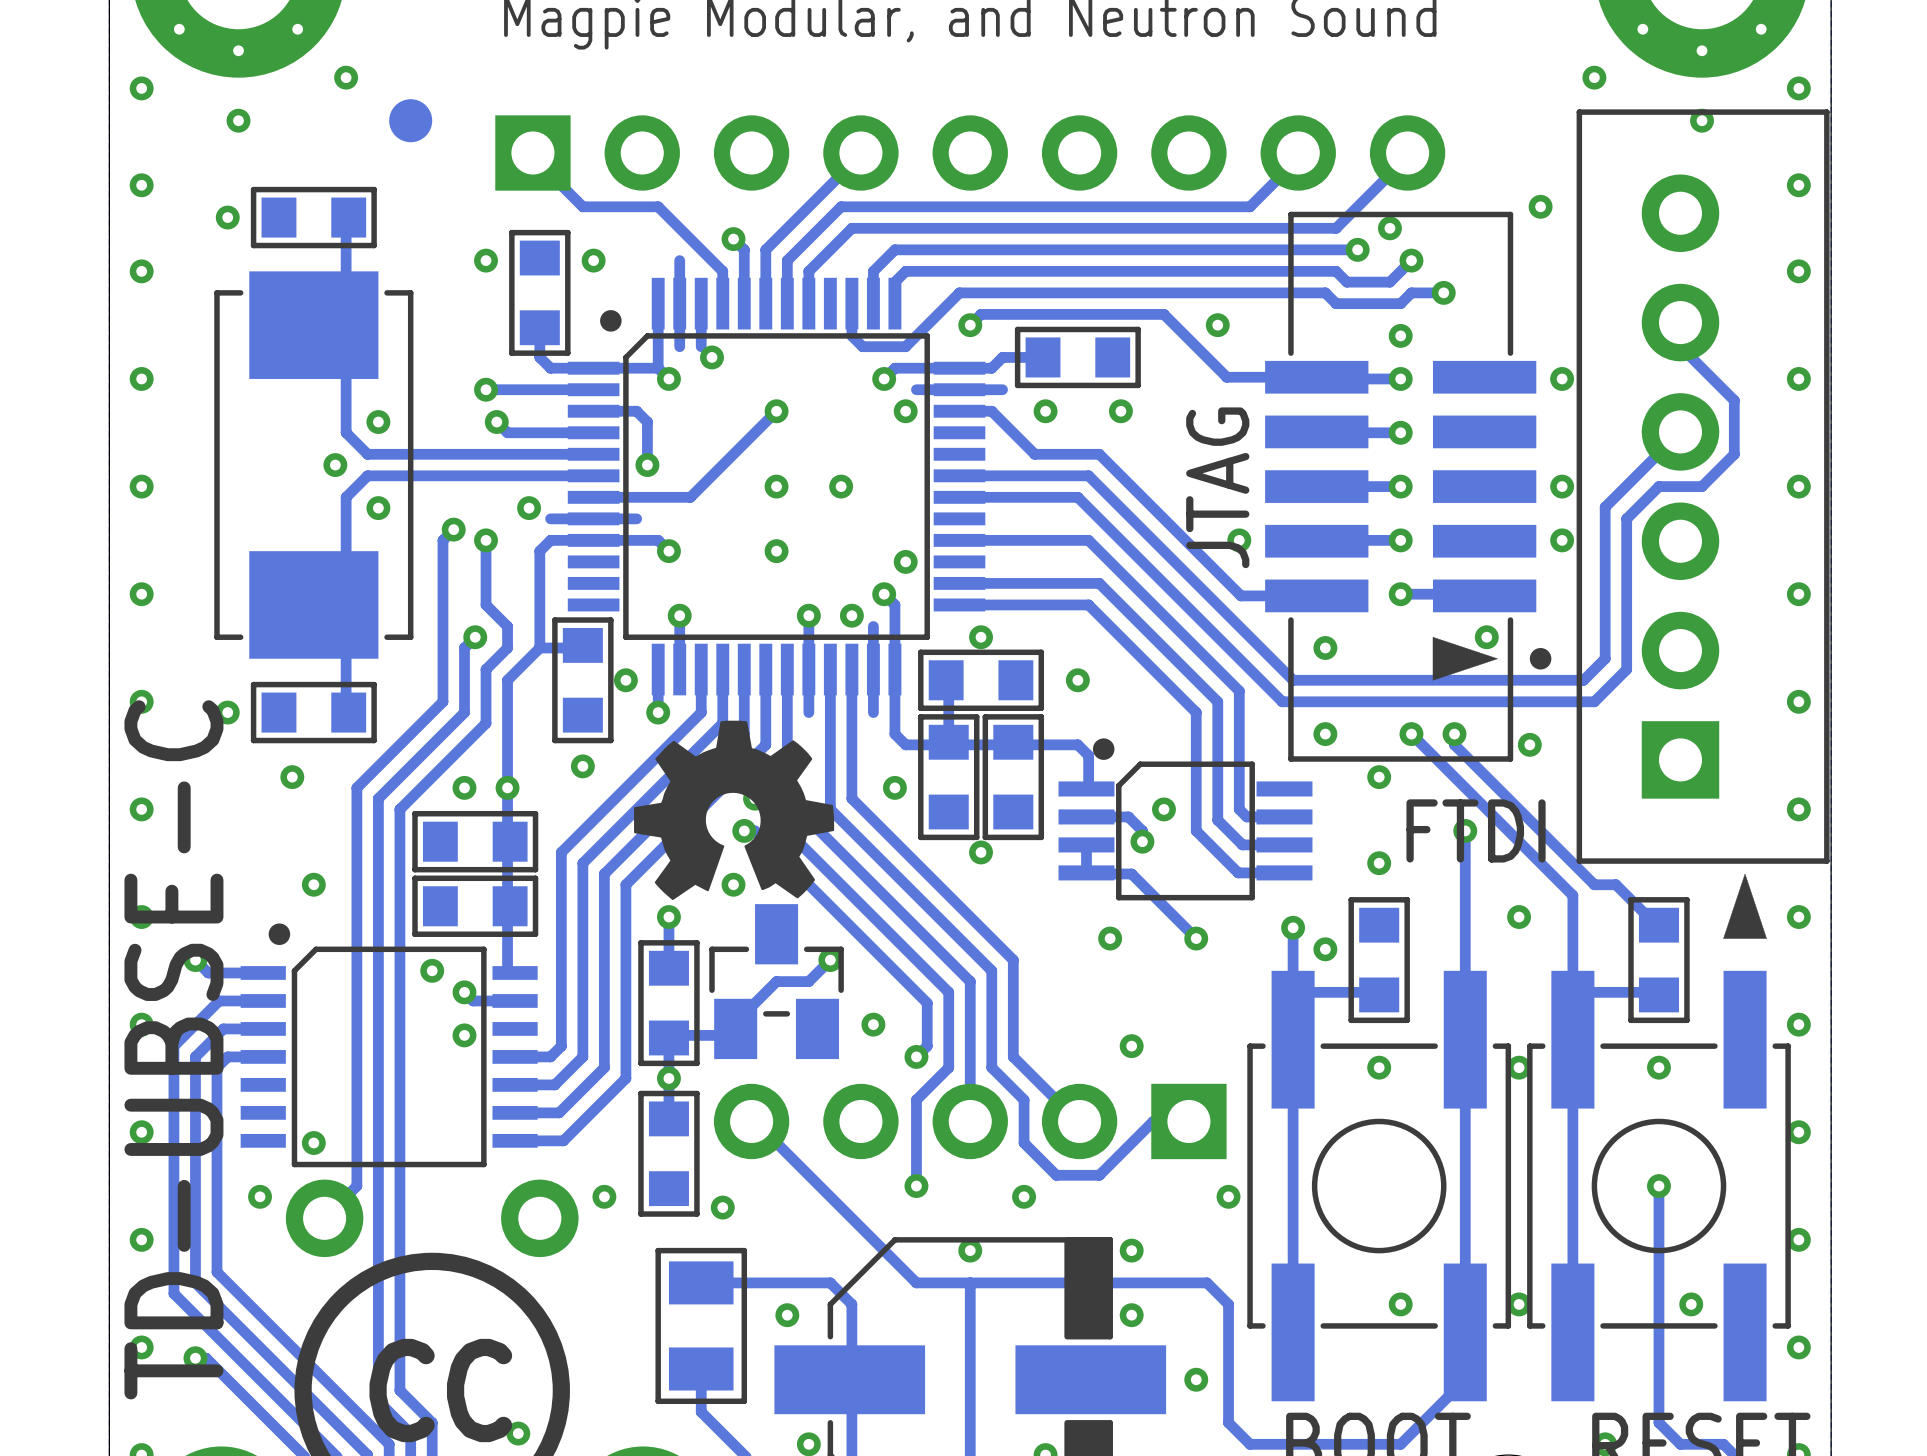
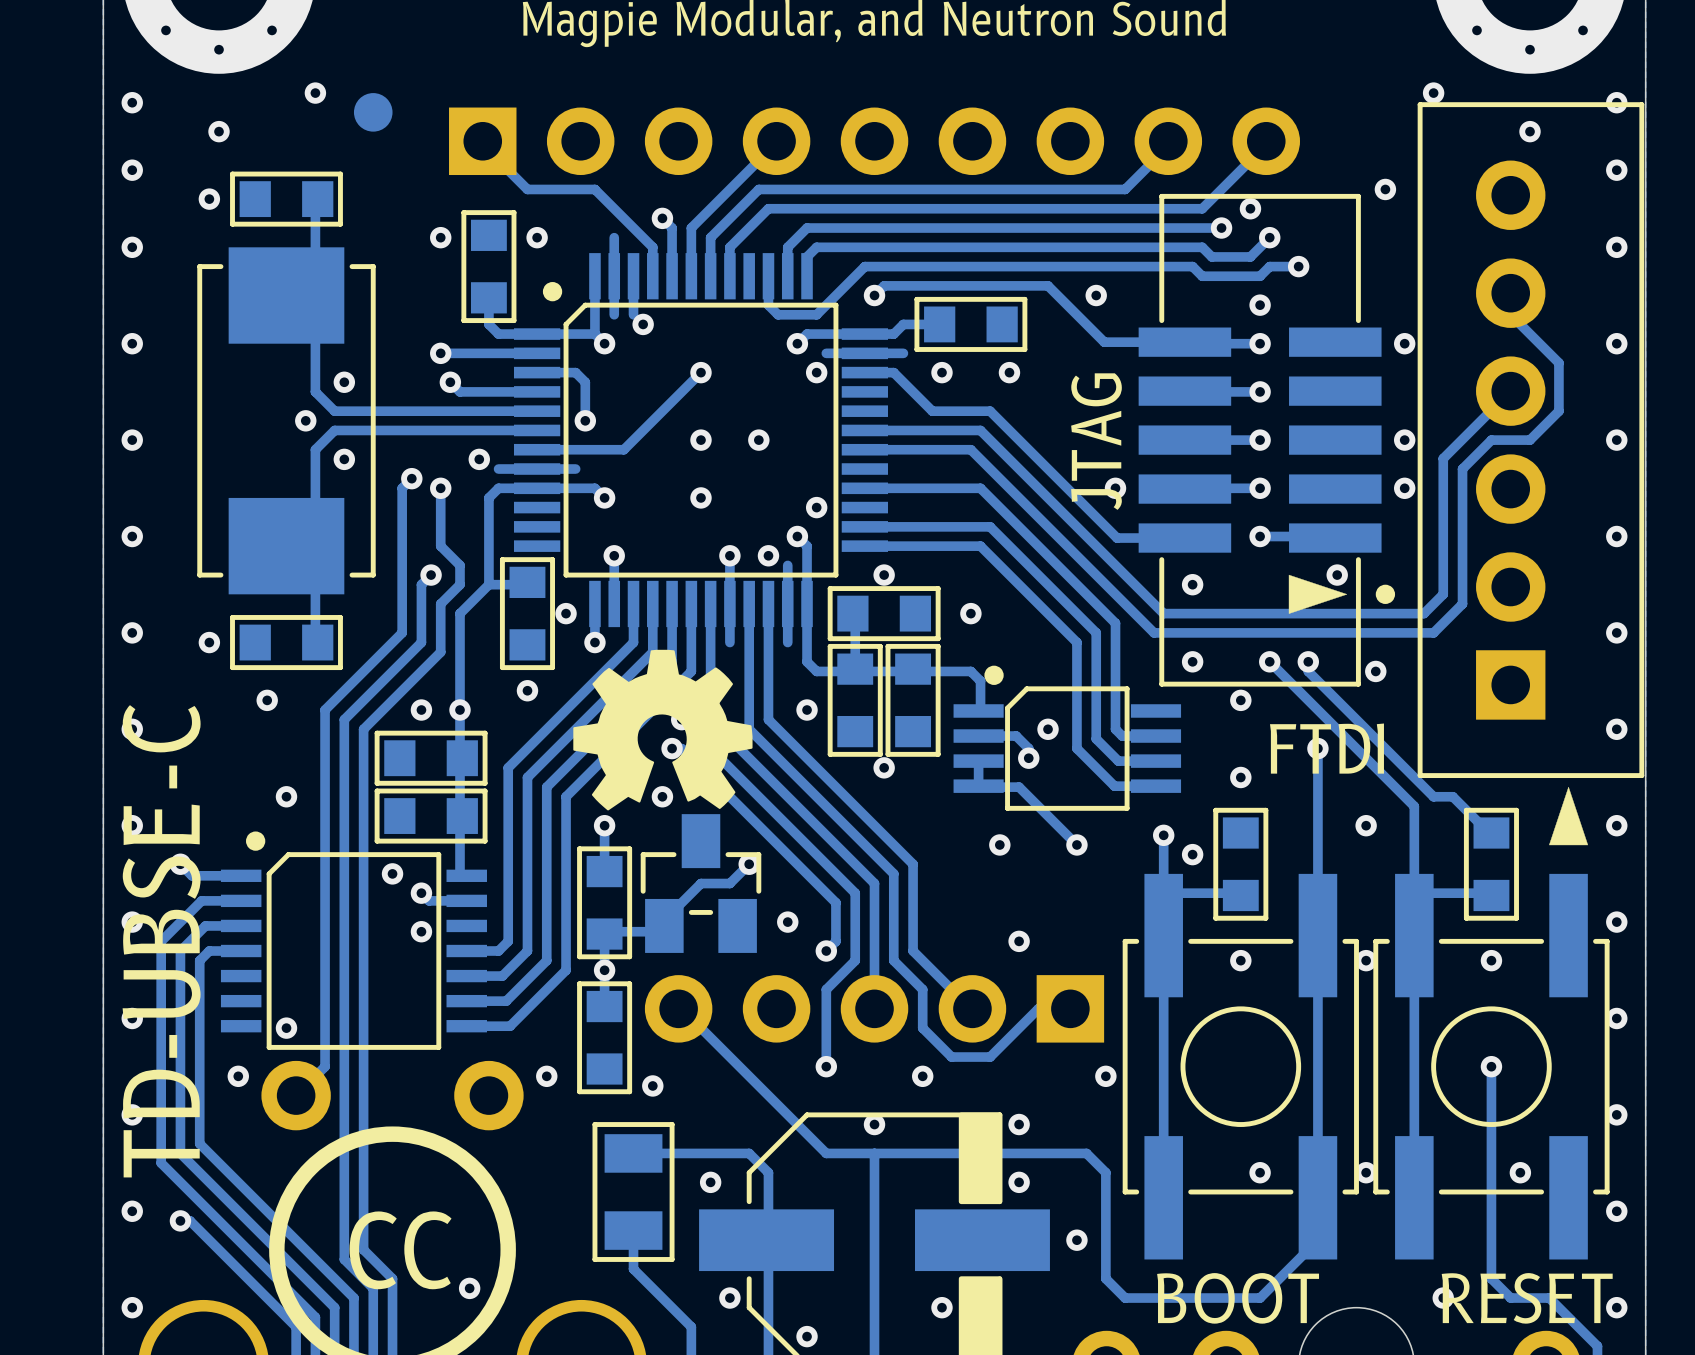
via position: (346, 77) -> (315, 93)
via position: (1594, 77) -> (1433, 93)
via position: (141, 88) -> (132, 102)
via position: (1798, 88) -> (1616, 102)
via position: (238, 120) -> (219, 131)
via position: (1702, 120) -> (1530, 131)

